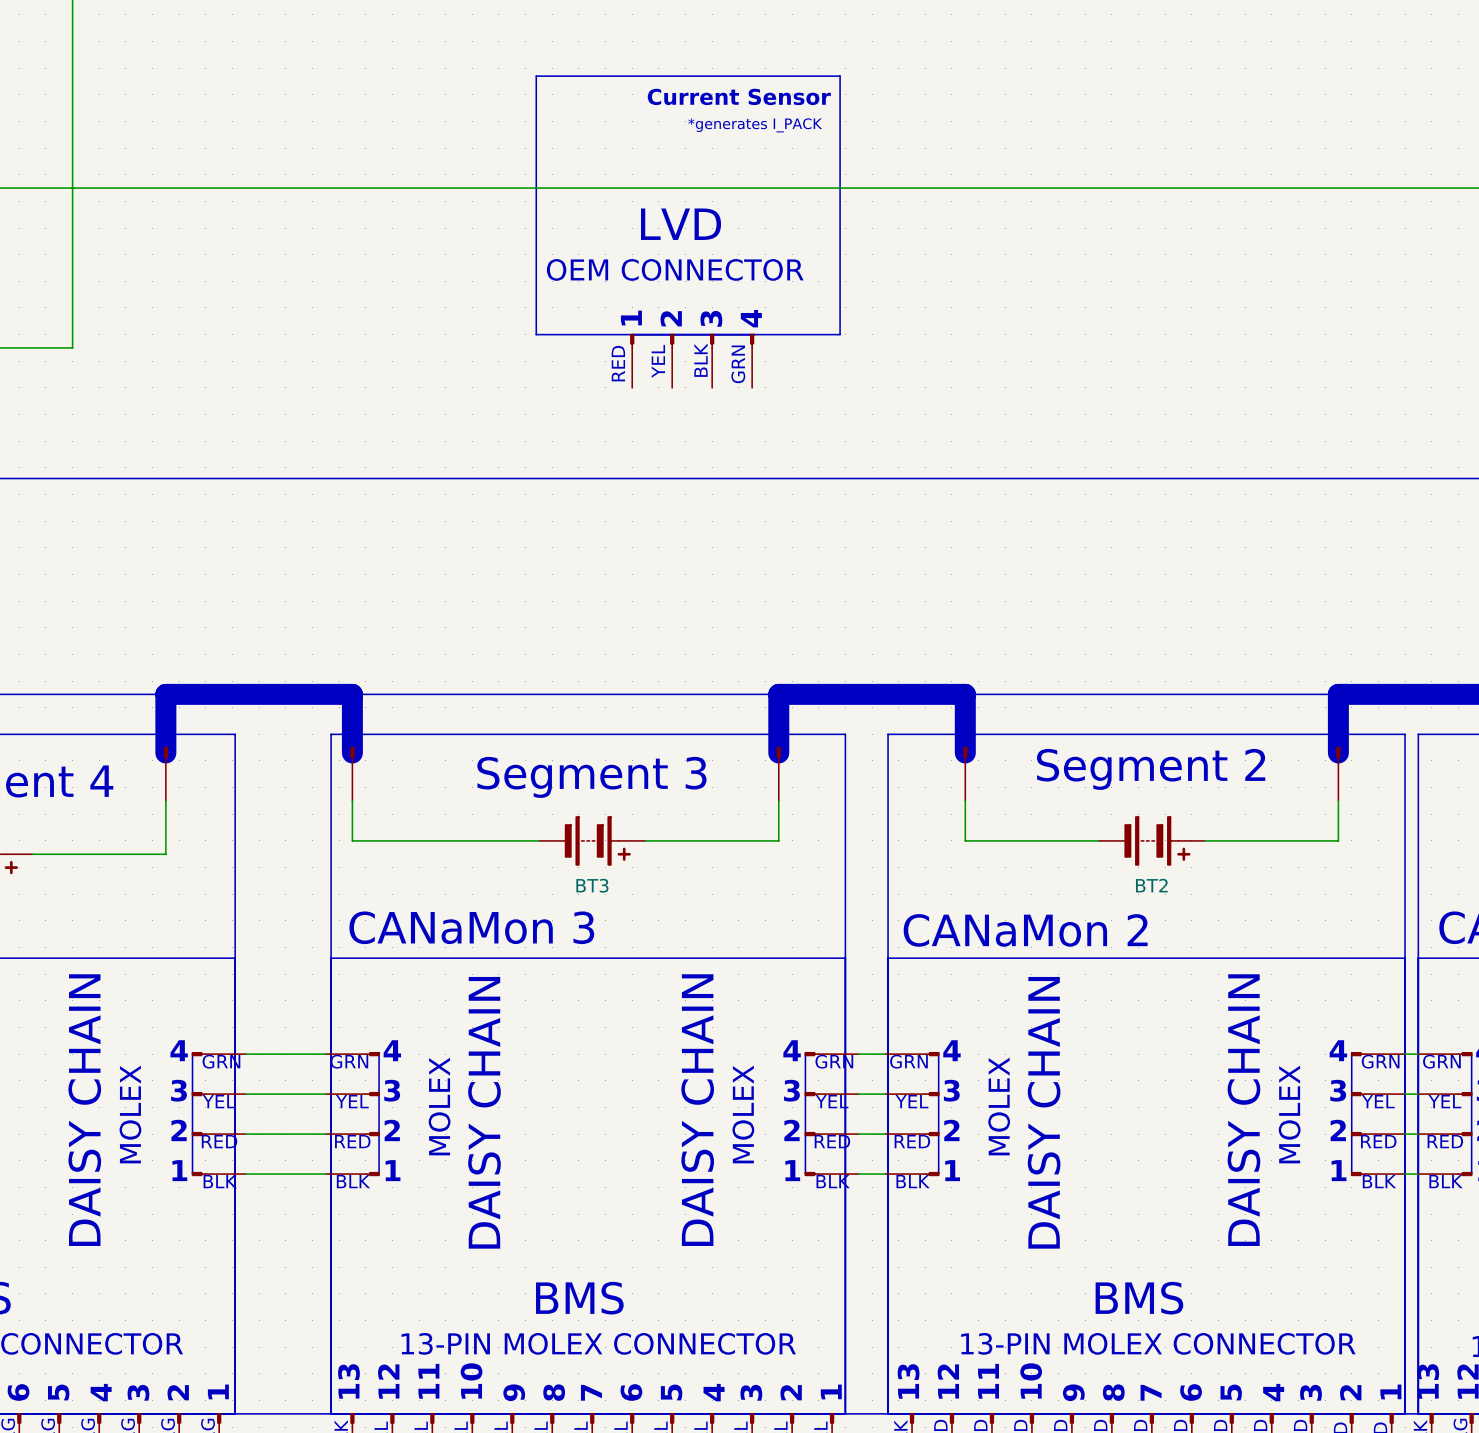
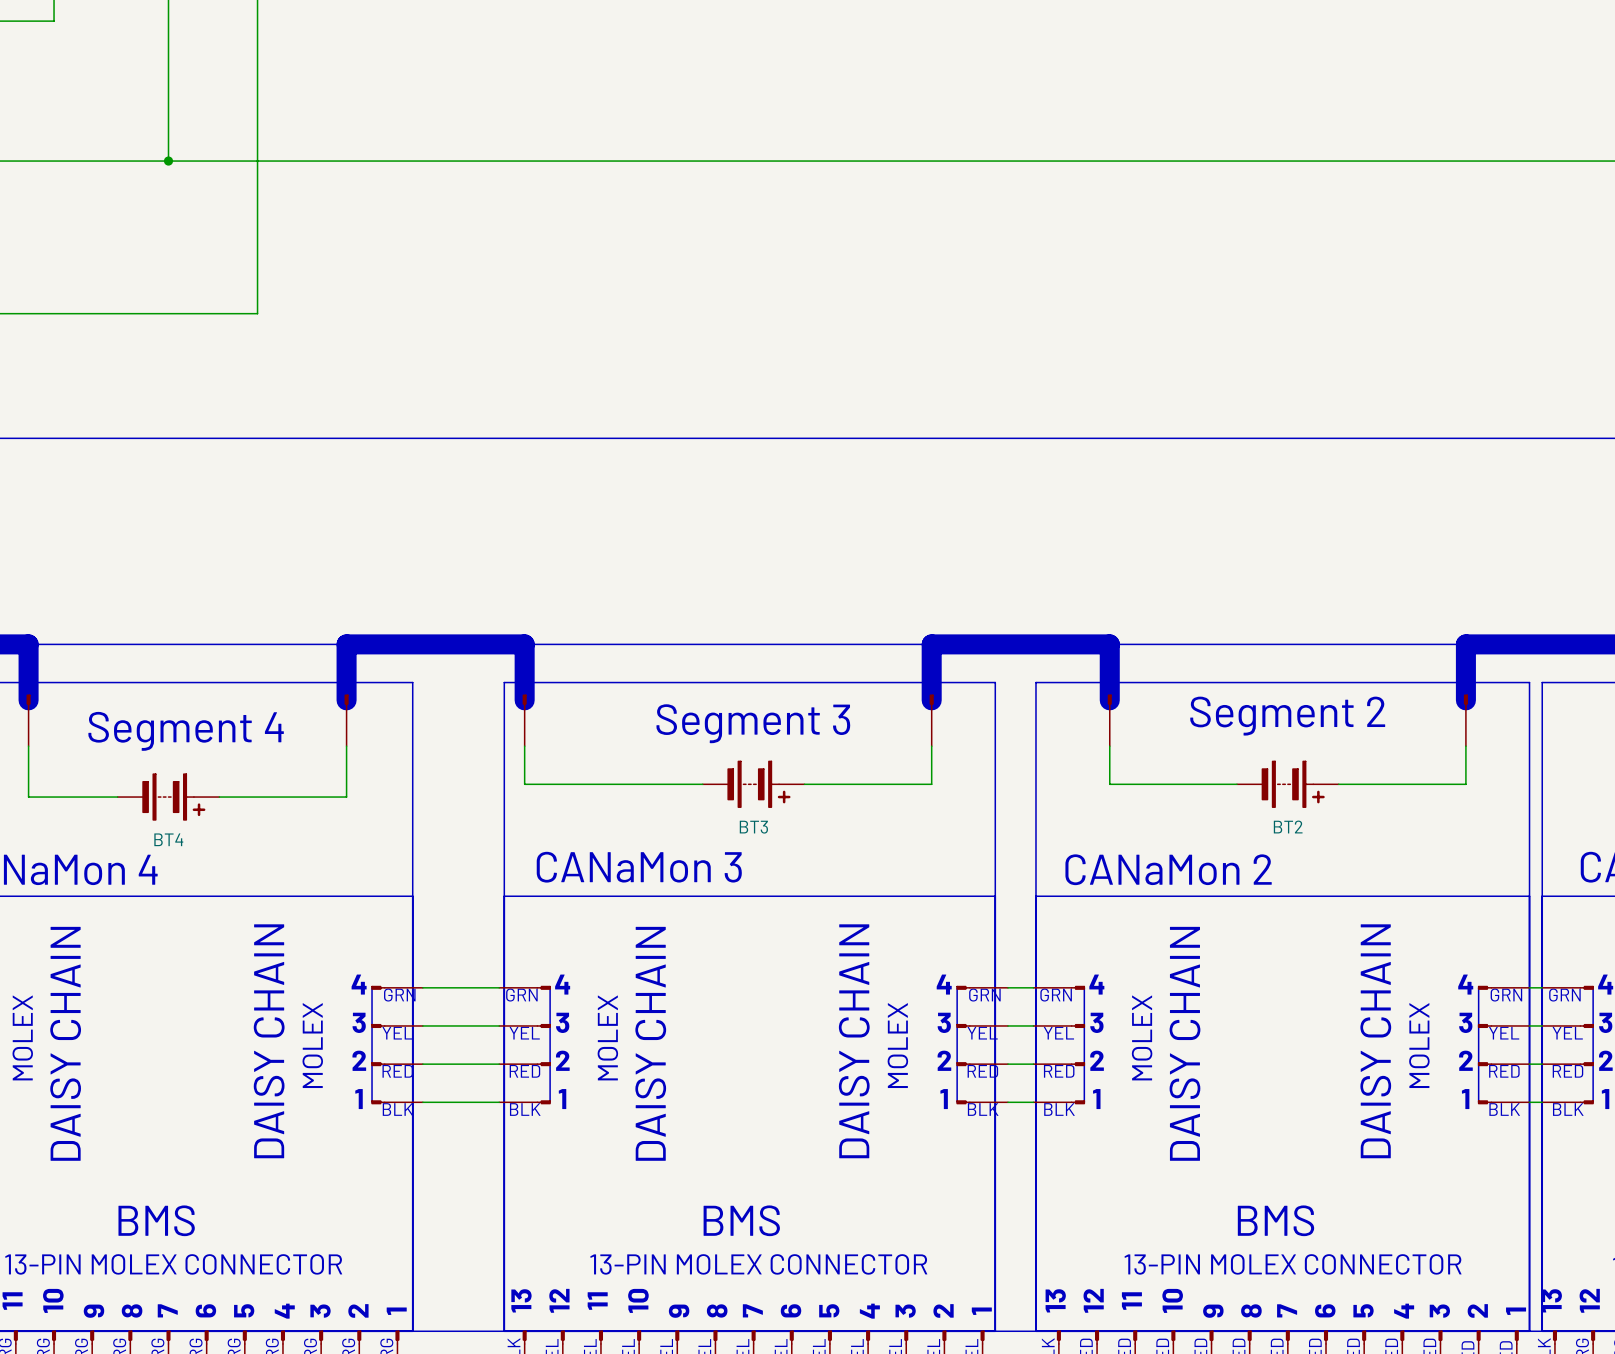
line: (536, 76) (840, 76) (840, 334) (536, 334) (536, 76) -> none
text: Current Sensor (739, 96) -> none
text: *generates I_PACK (755, 125) -> none
text: LVD (681, 224) -> none
text: OEM CONNECTOR (675, 269) -> none
text: 1 (631, 318) -> none
text: 2 (671, 318) -> none
text: 3 (711, 318) -> none
text: 4 (751, 318) -> none
part: (632, 360) -> none
part: (672, 360) -> none
text: BLK (701, 360) -> none
part: (712, 360) -> none
part: (752, 360) -> none
text: YEL (658, 361) -> none
text: RED (618, 363) -> none
text: GRN (738, 364) -> none

